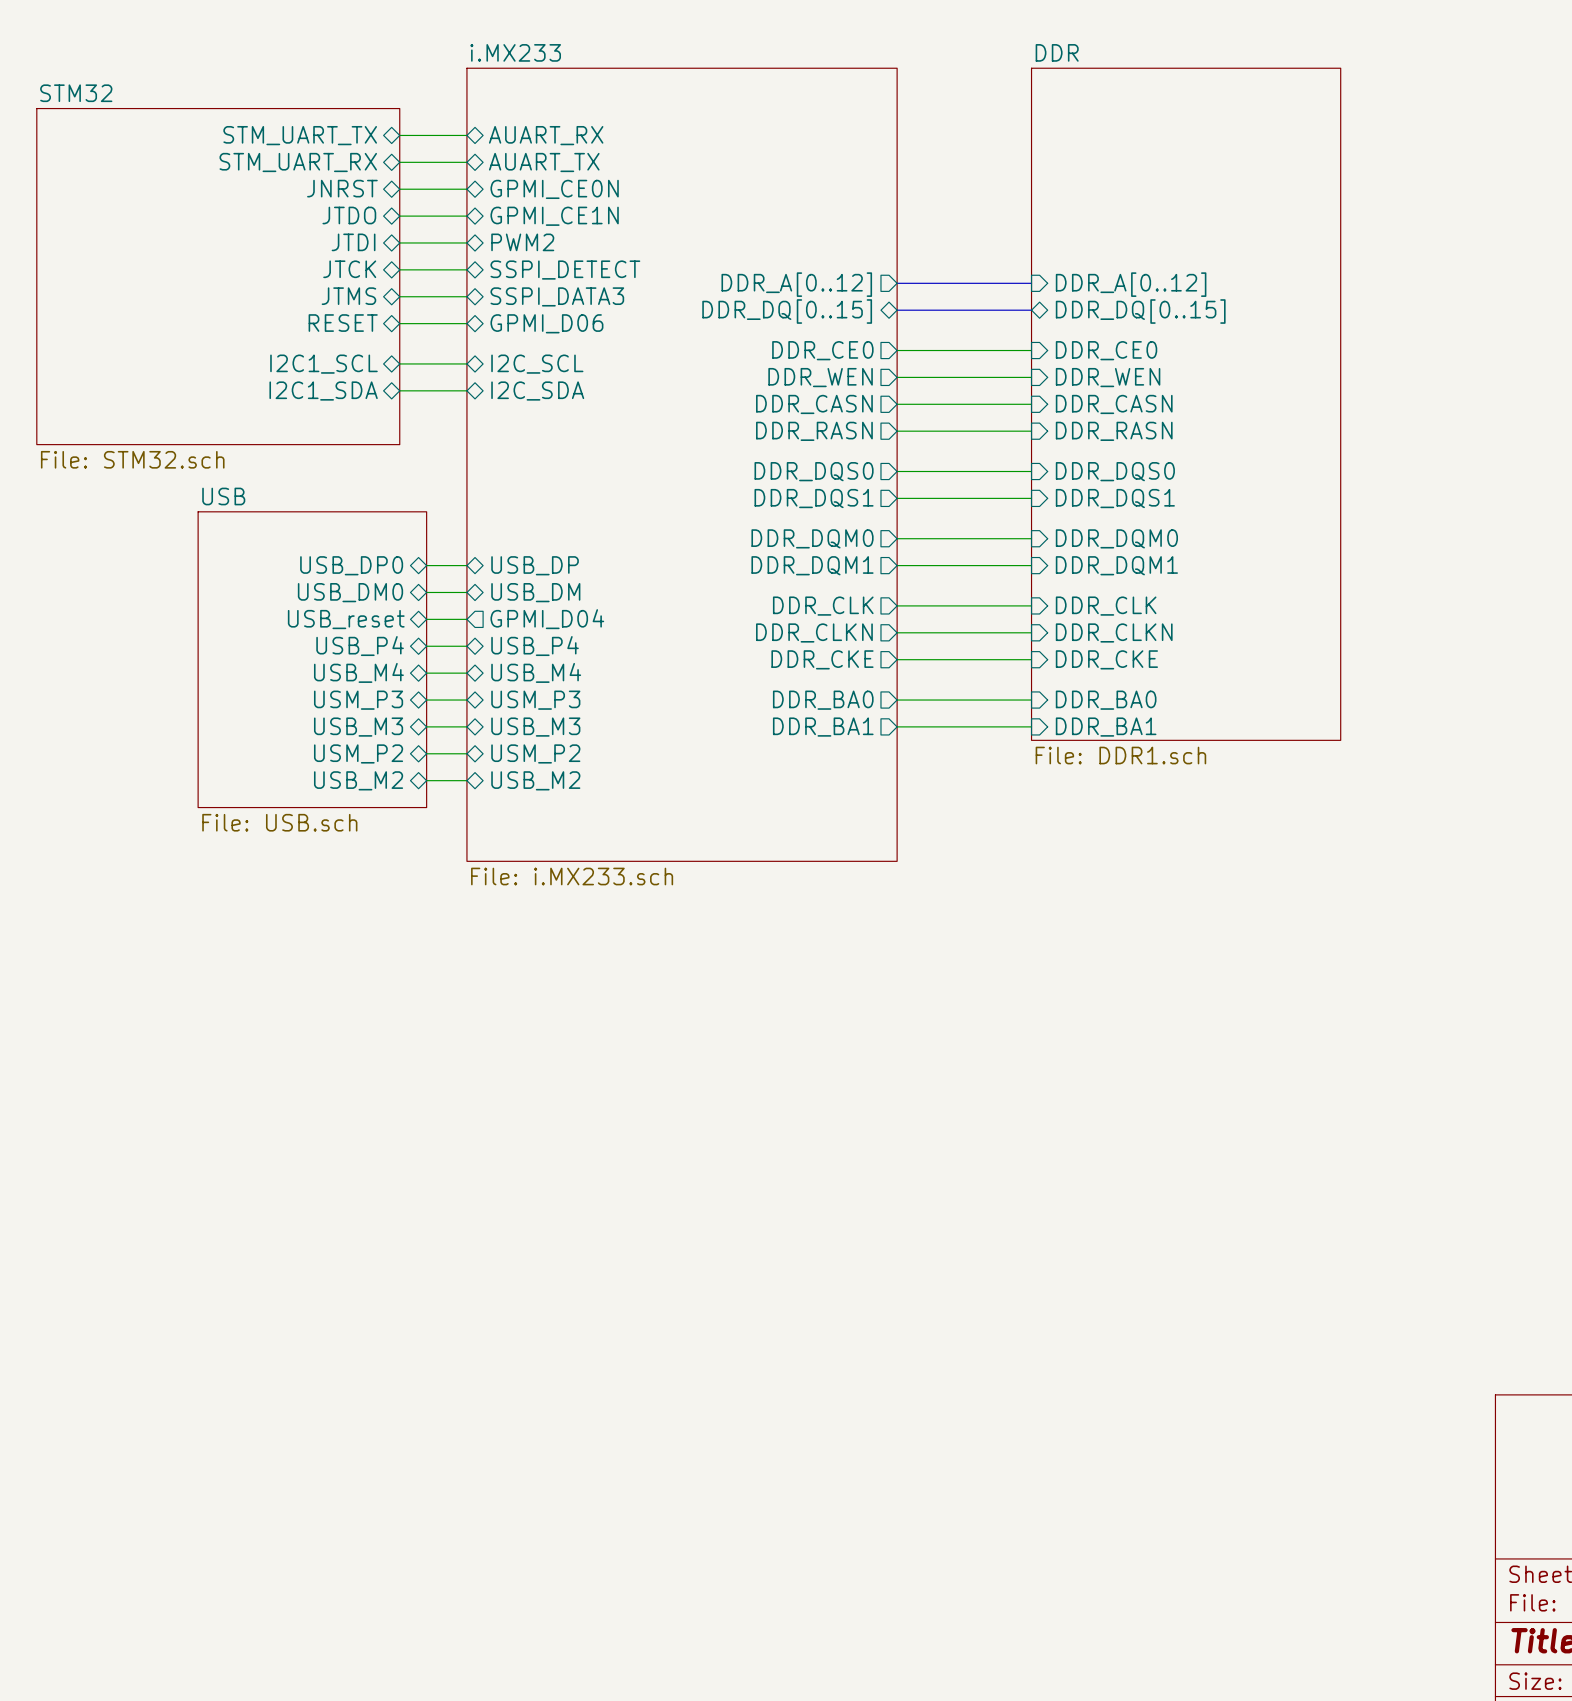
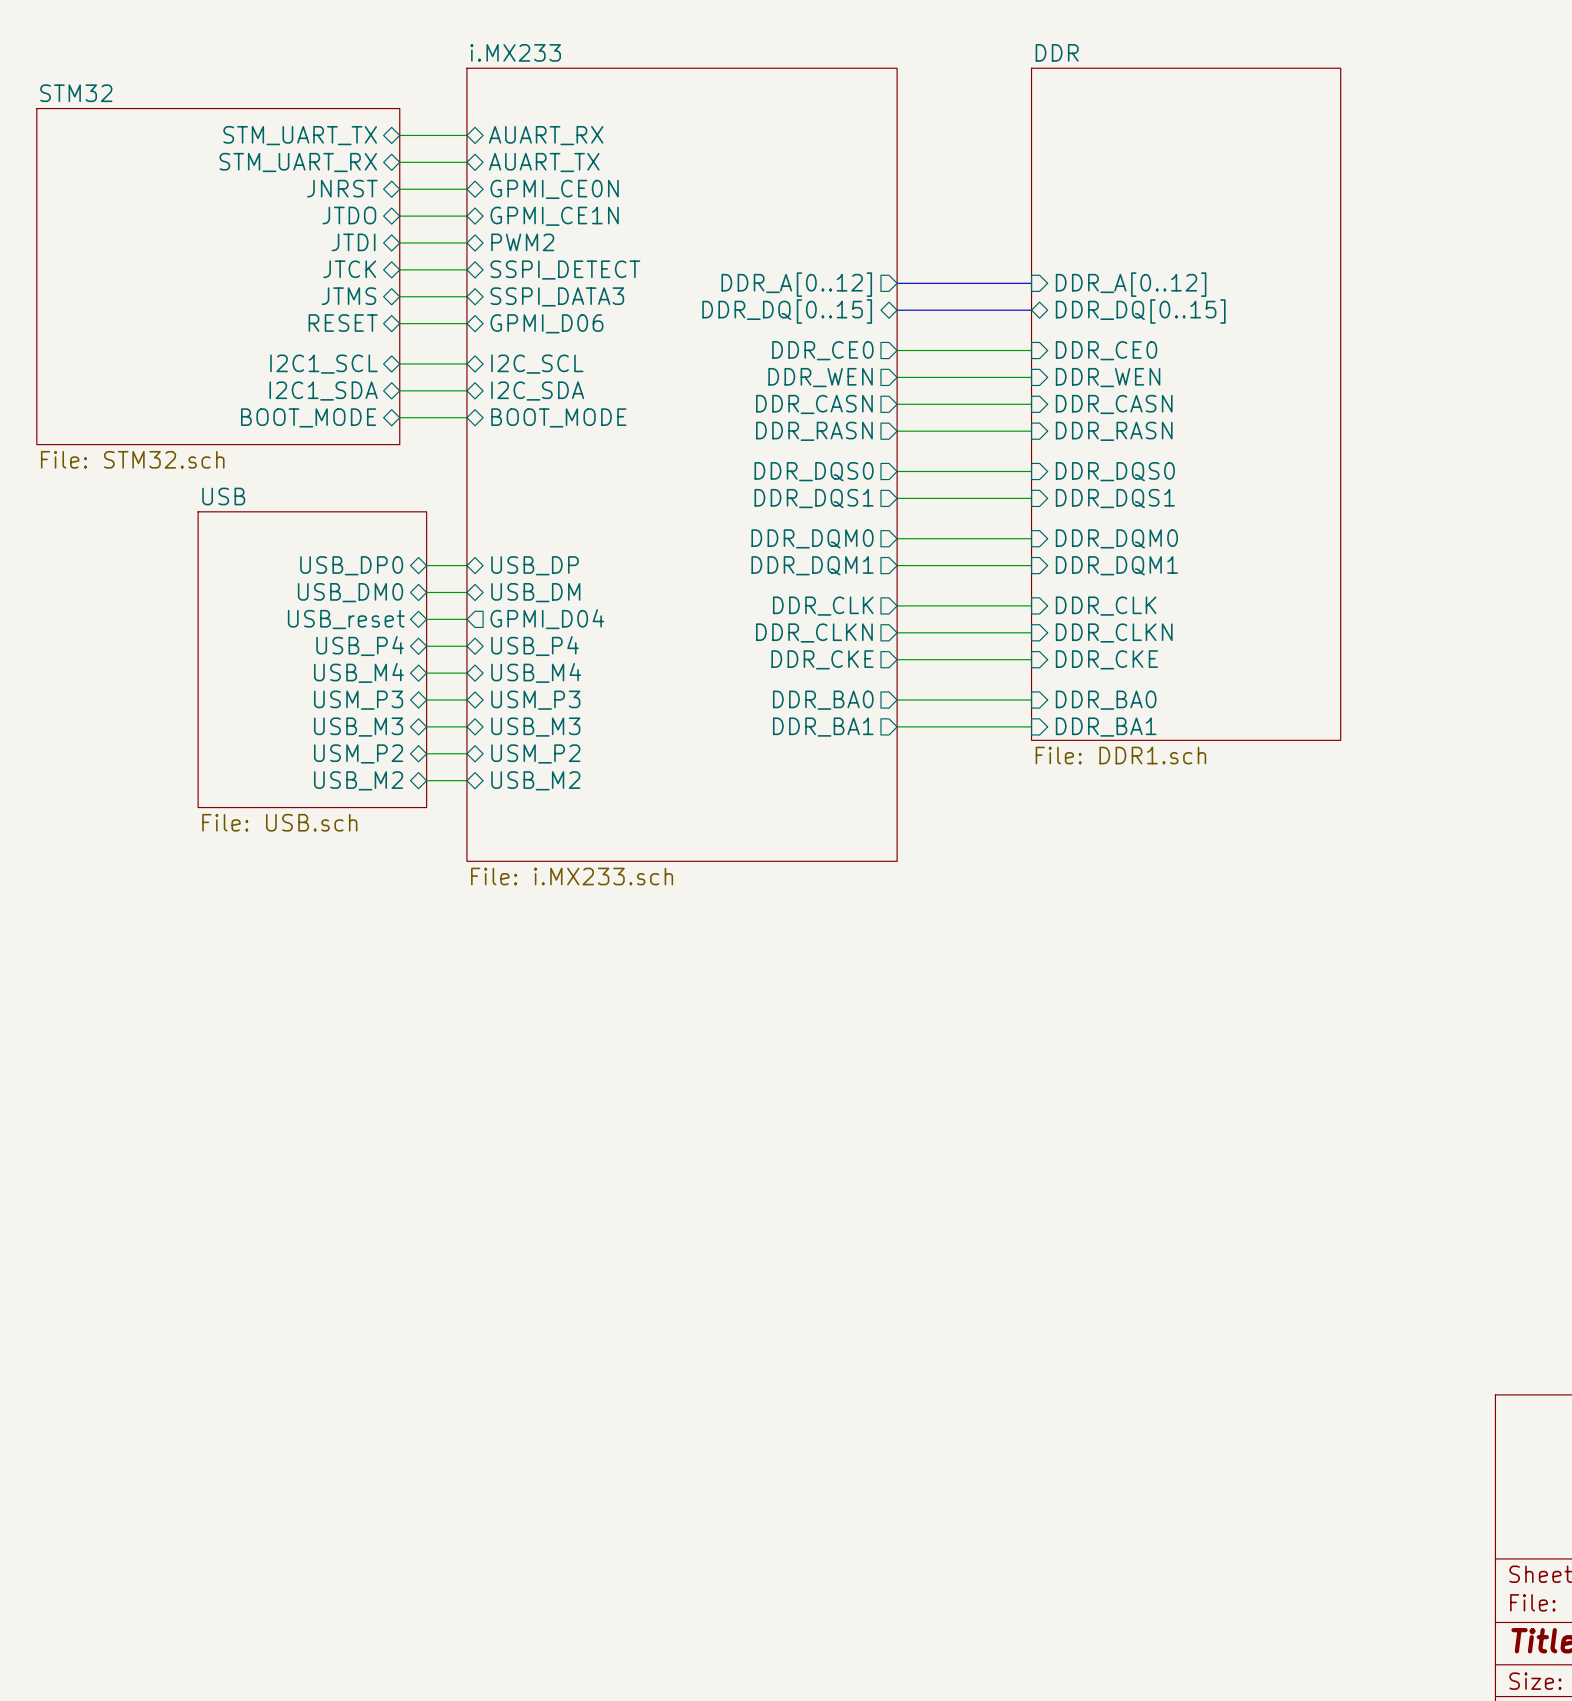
sheet pin: none -> BOOT_MODE (308, 417)
wire: none -> (399, 417) (466, 417)
sheet pin: none -> BOOT_MODE (558, 417)

